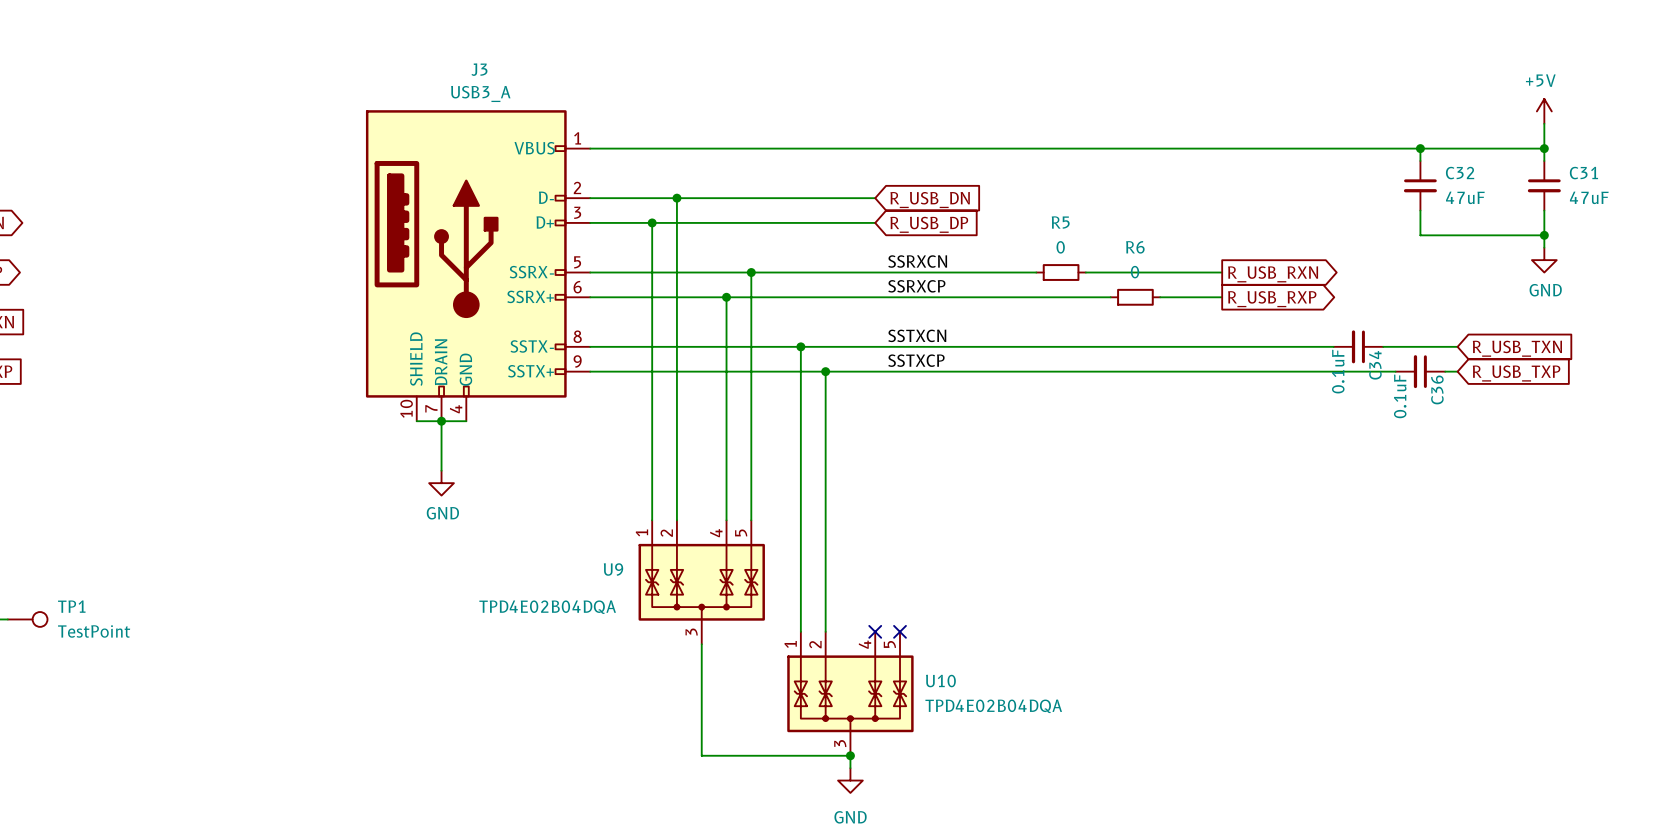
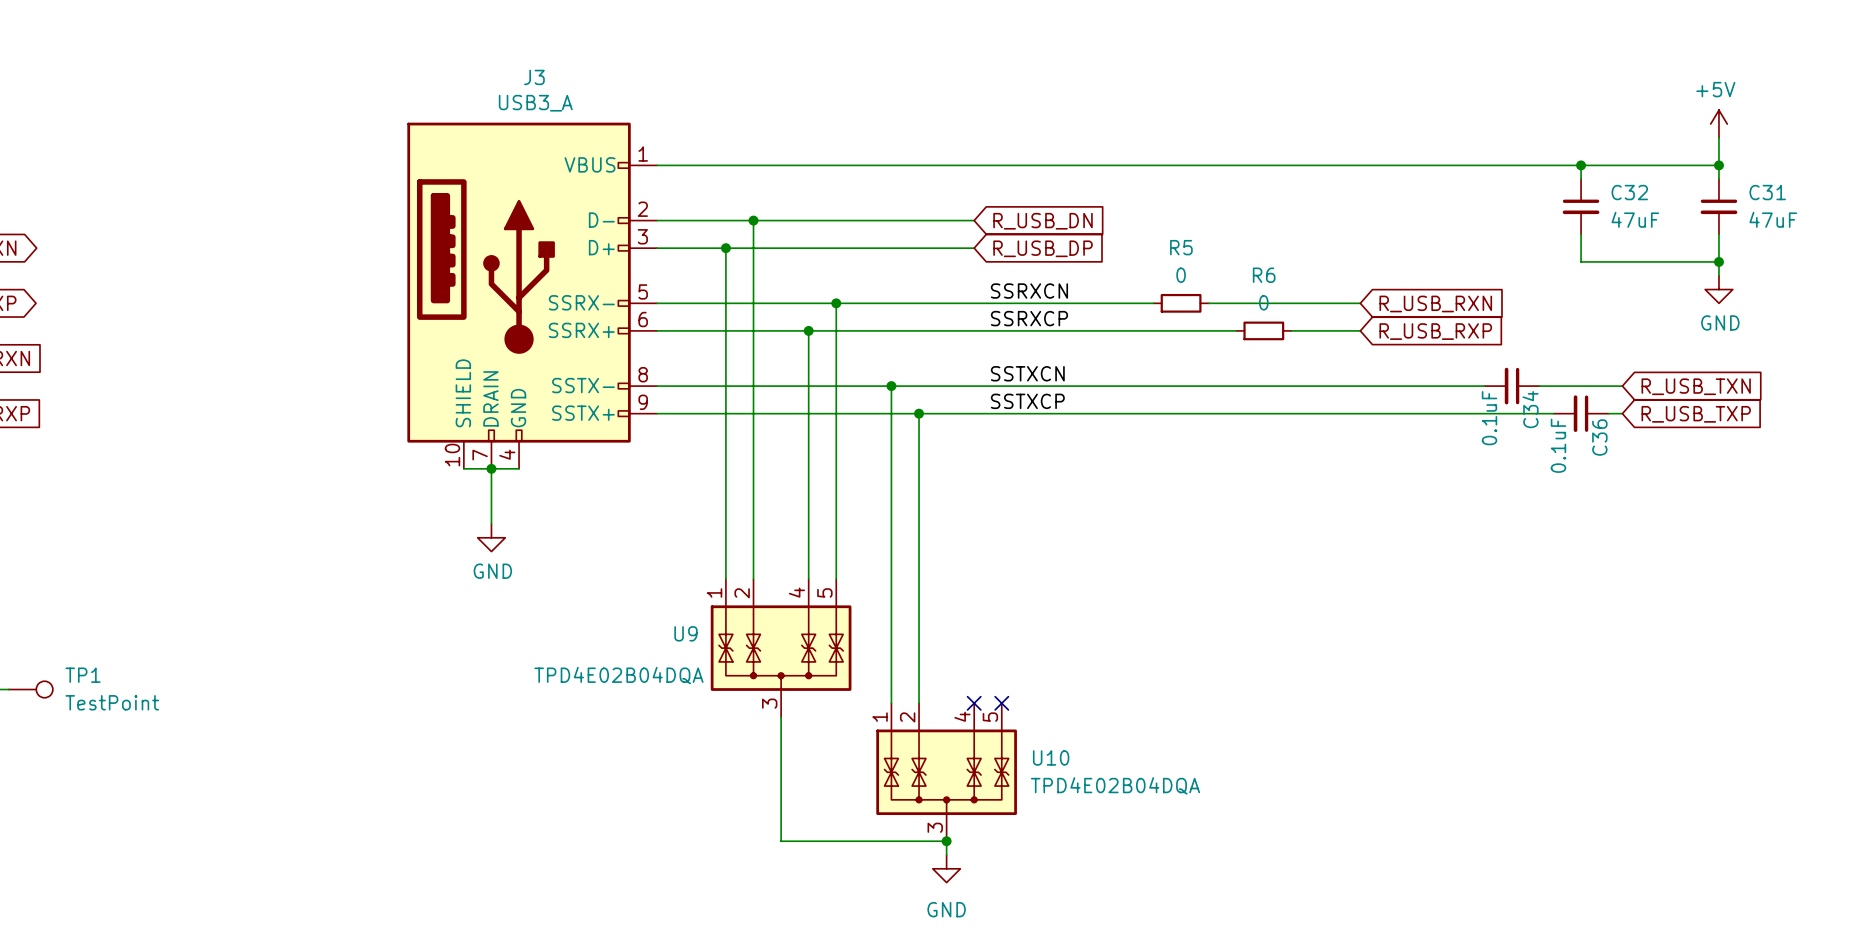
global label shape: output (1273, 274) -> input (1435, 303)
global label shape: output (1272, 299) -> input (1435, 331)

